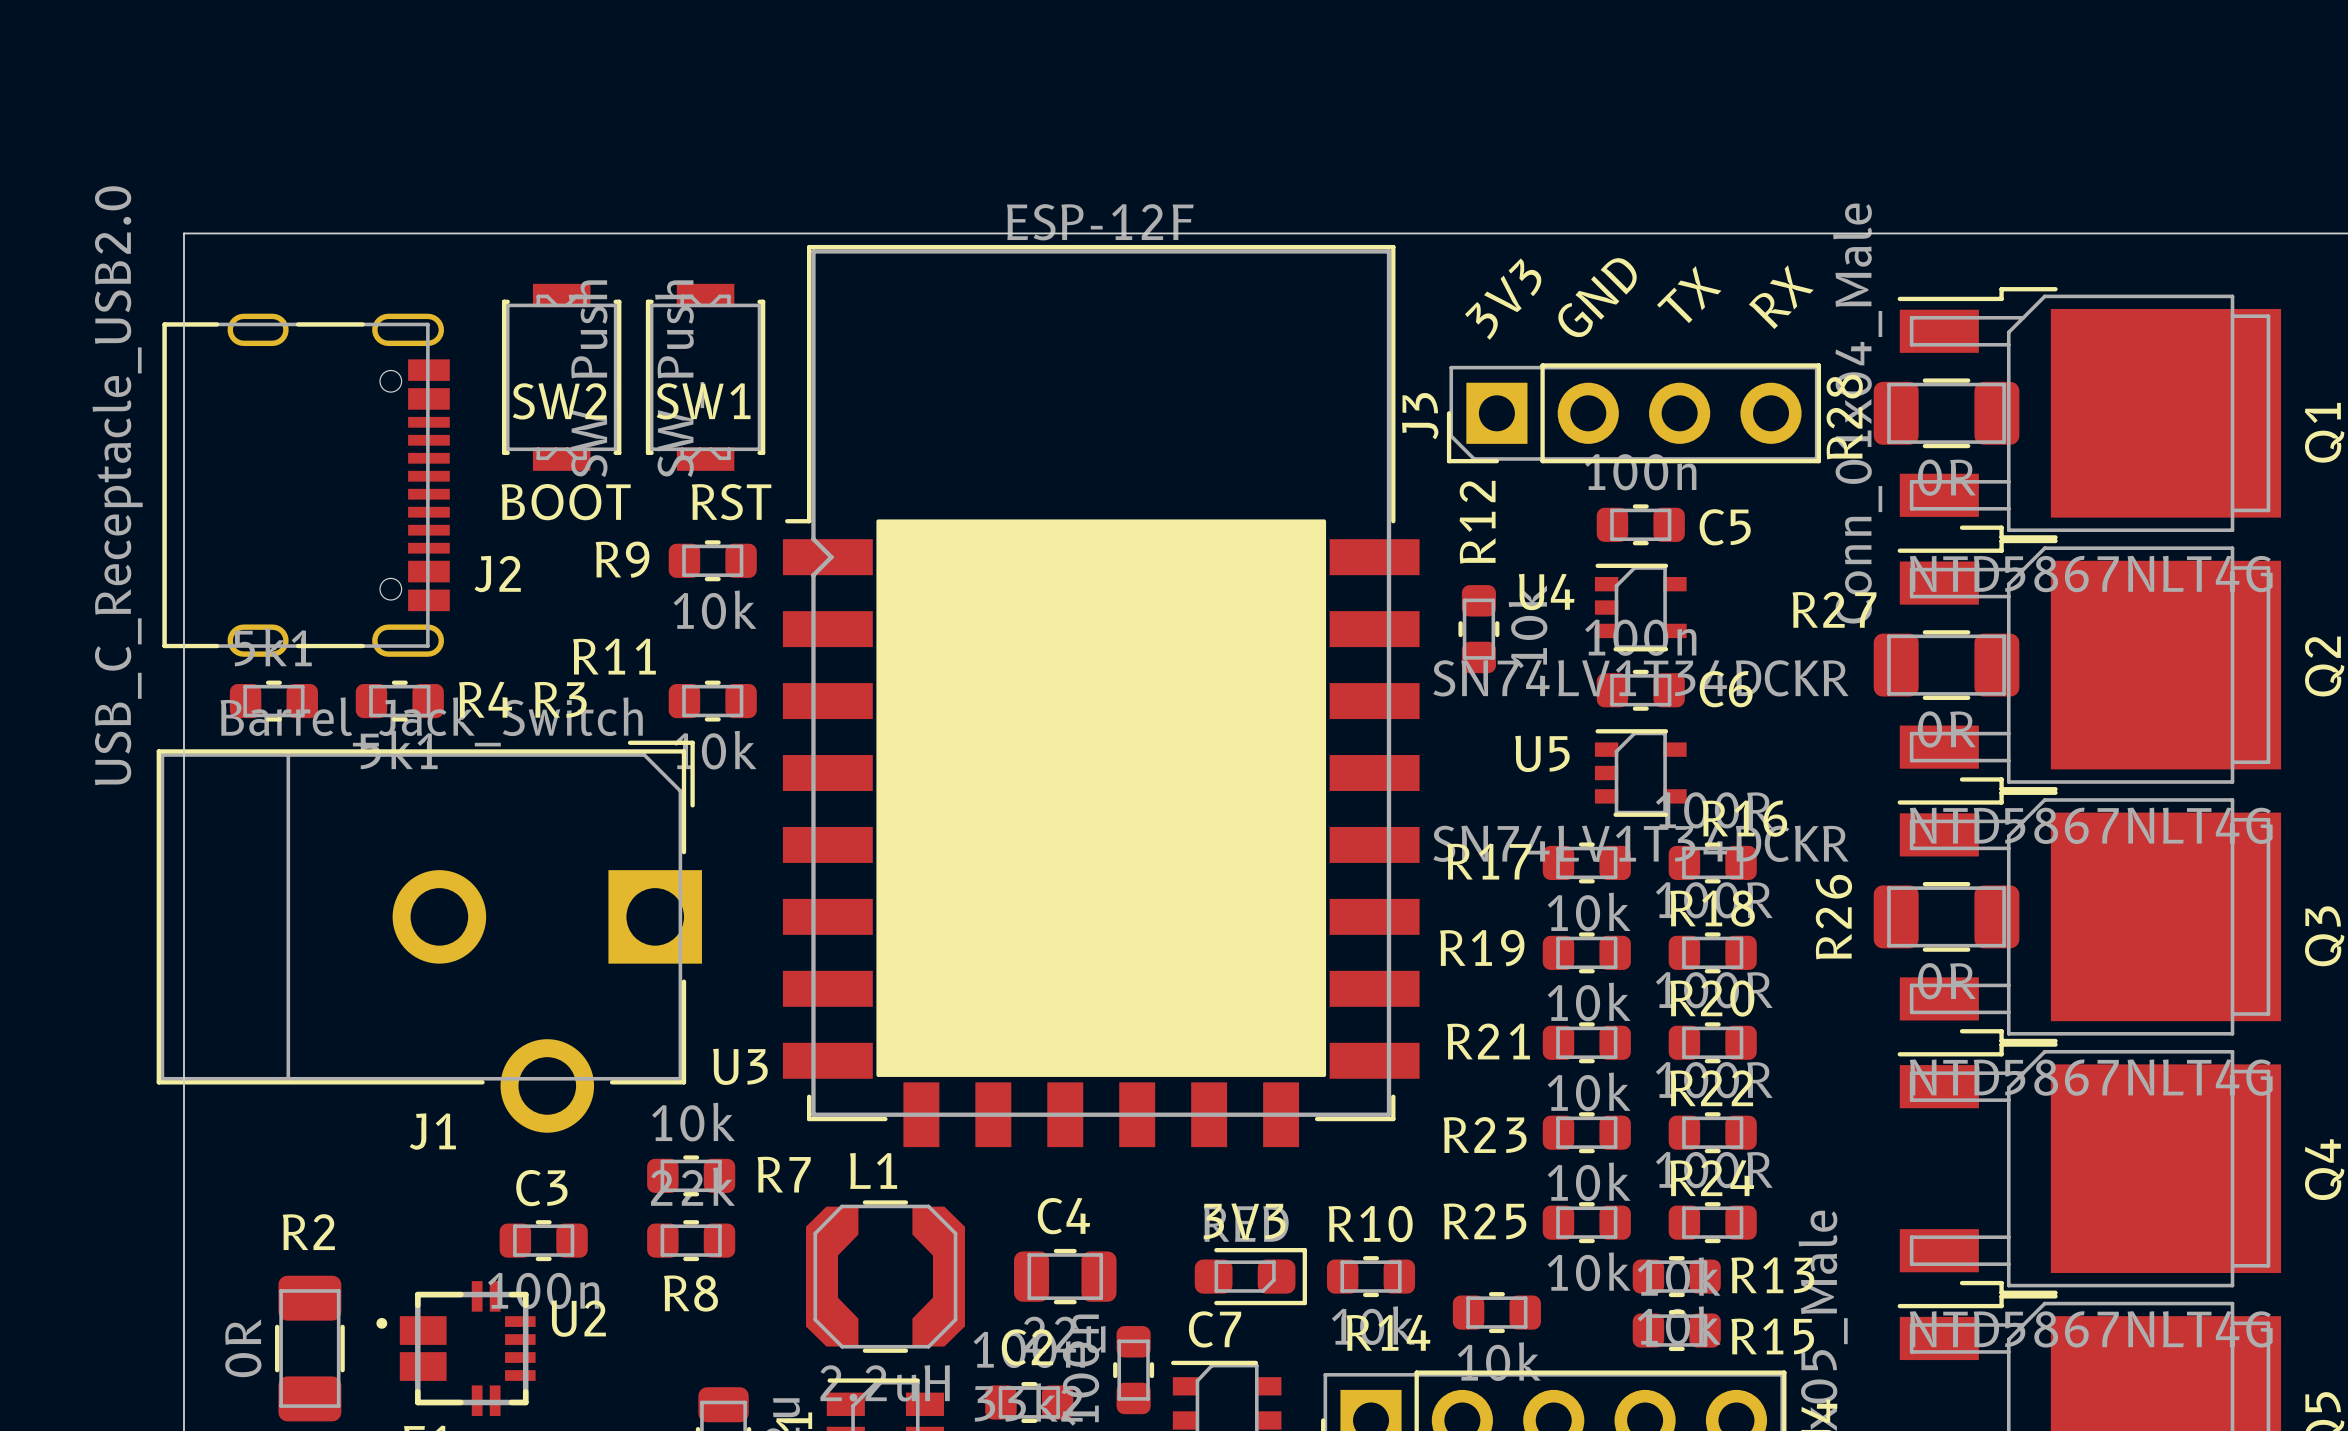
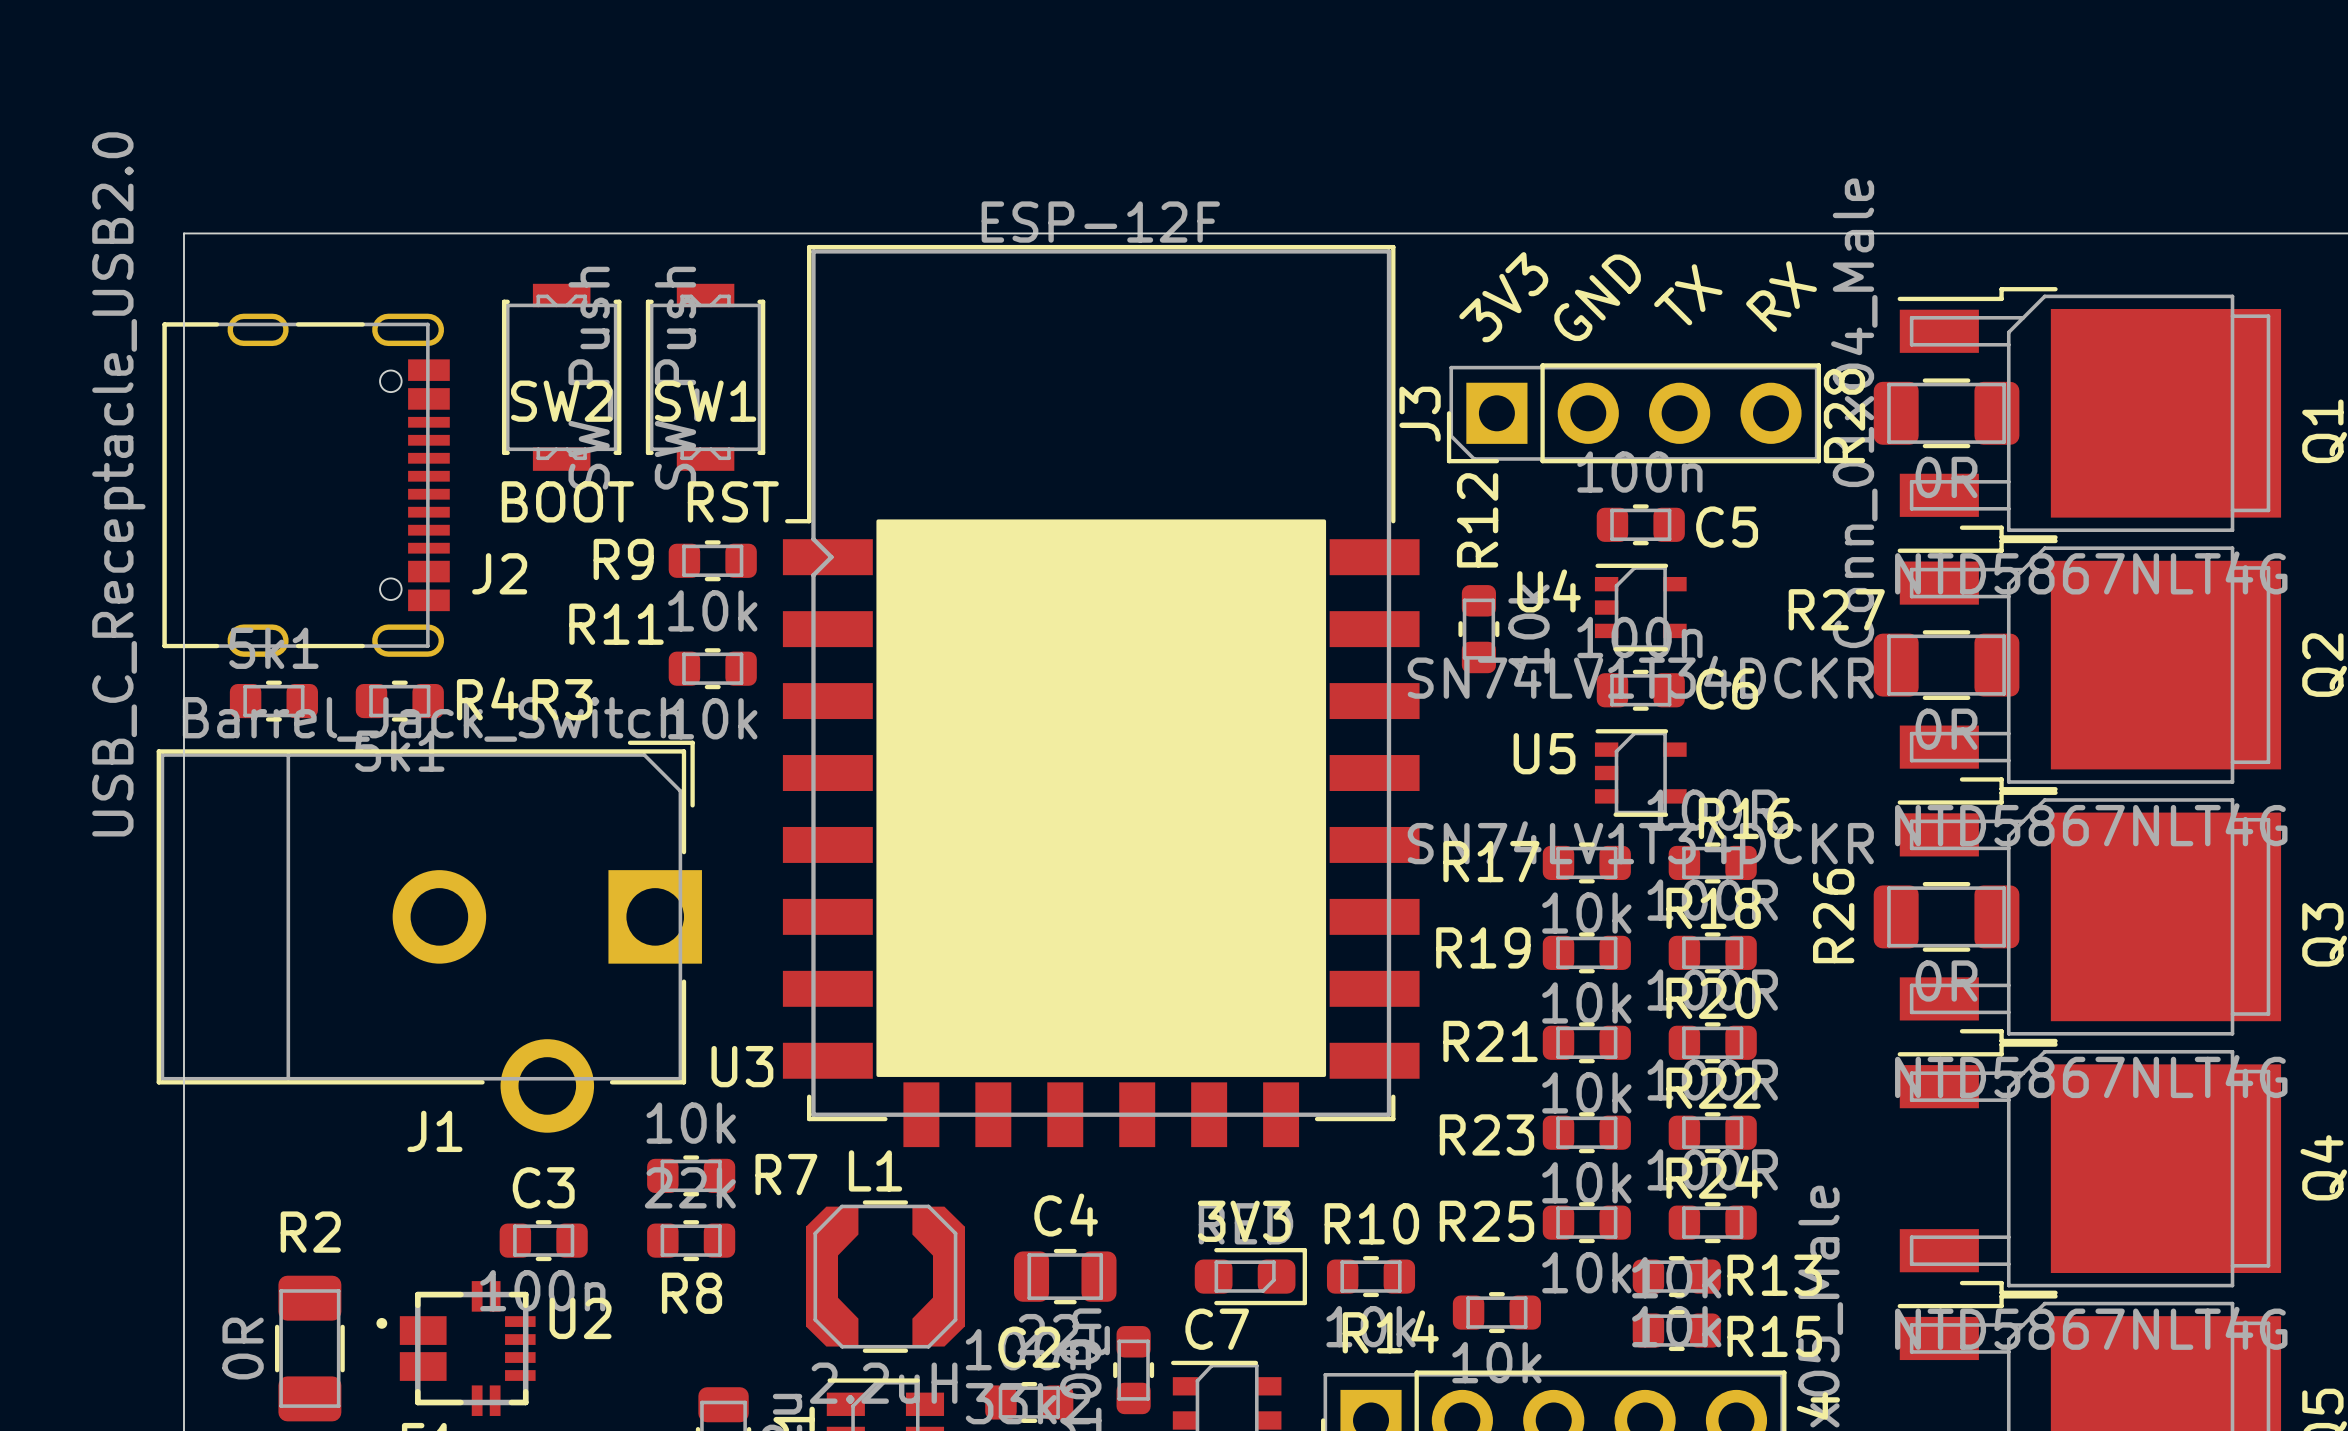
R11 position: (712, 701) -> (712, 668)

